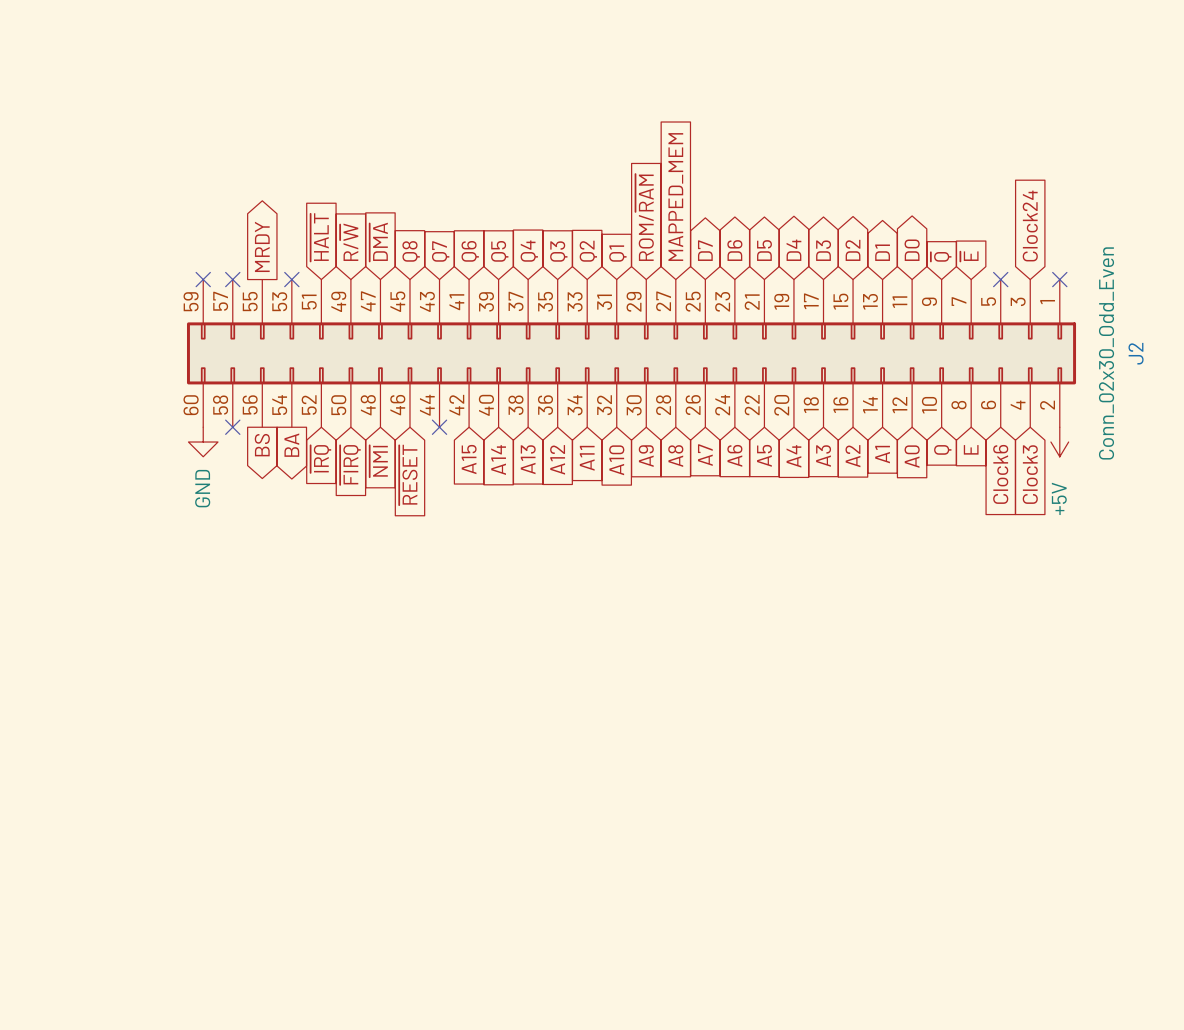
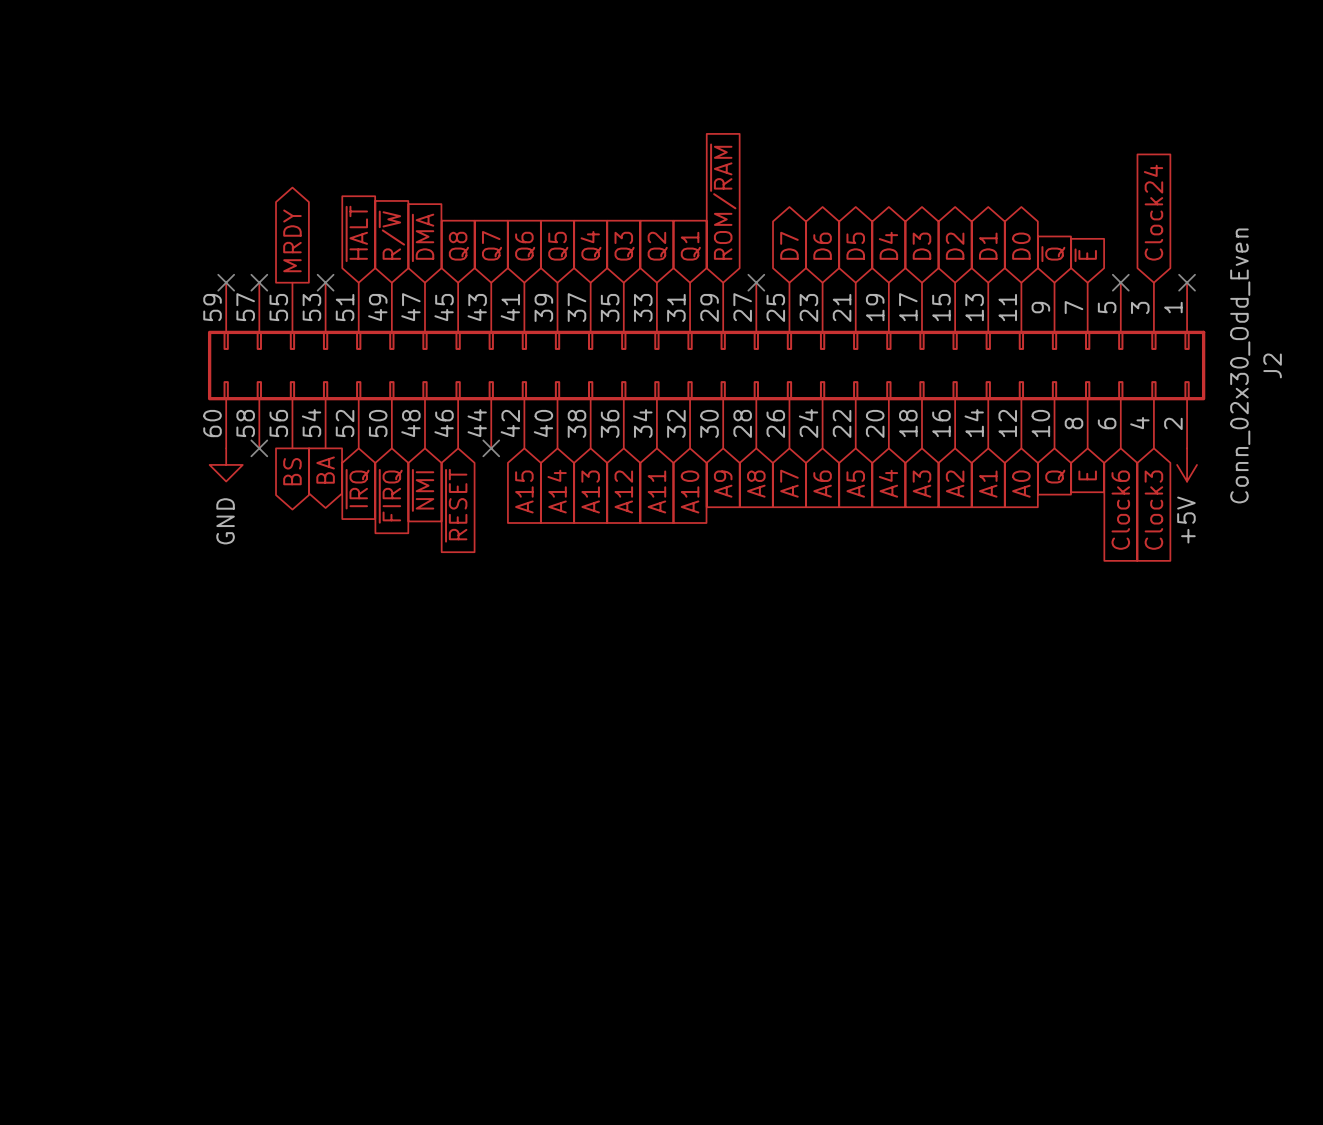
global label: MAPPED_MEM (675, 197) -> none
no-connect mark: none -> (756, 282)

